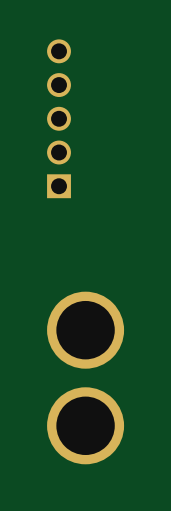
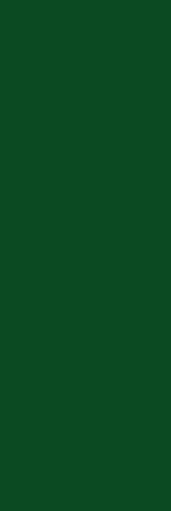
part: (59, 118) -> none
part: (85, 377) -> none

